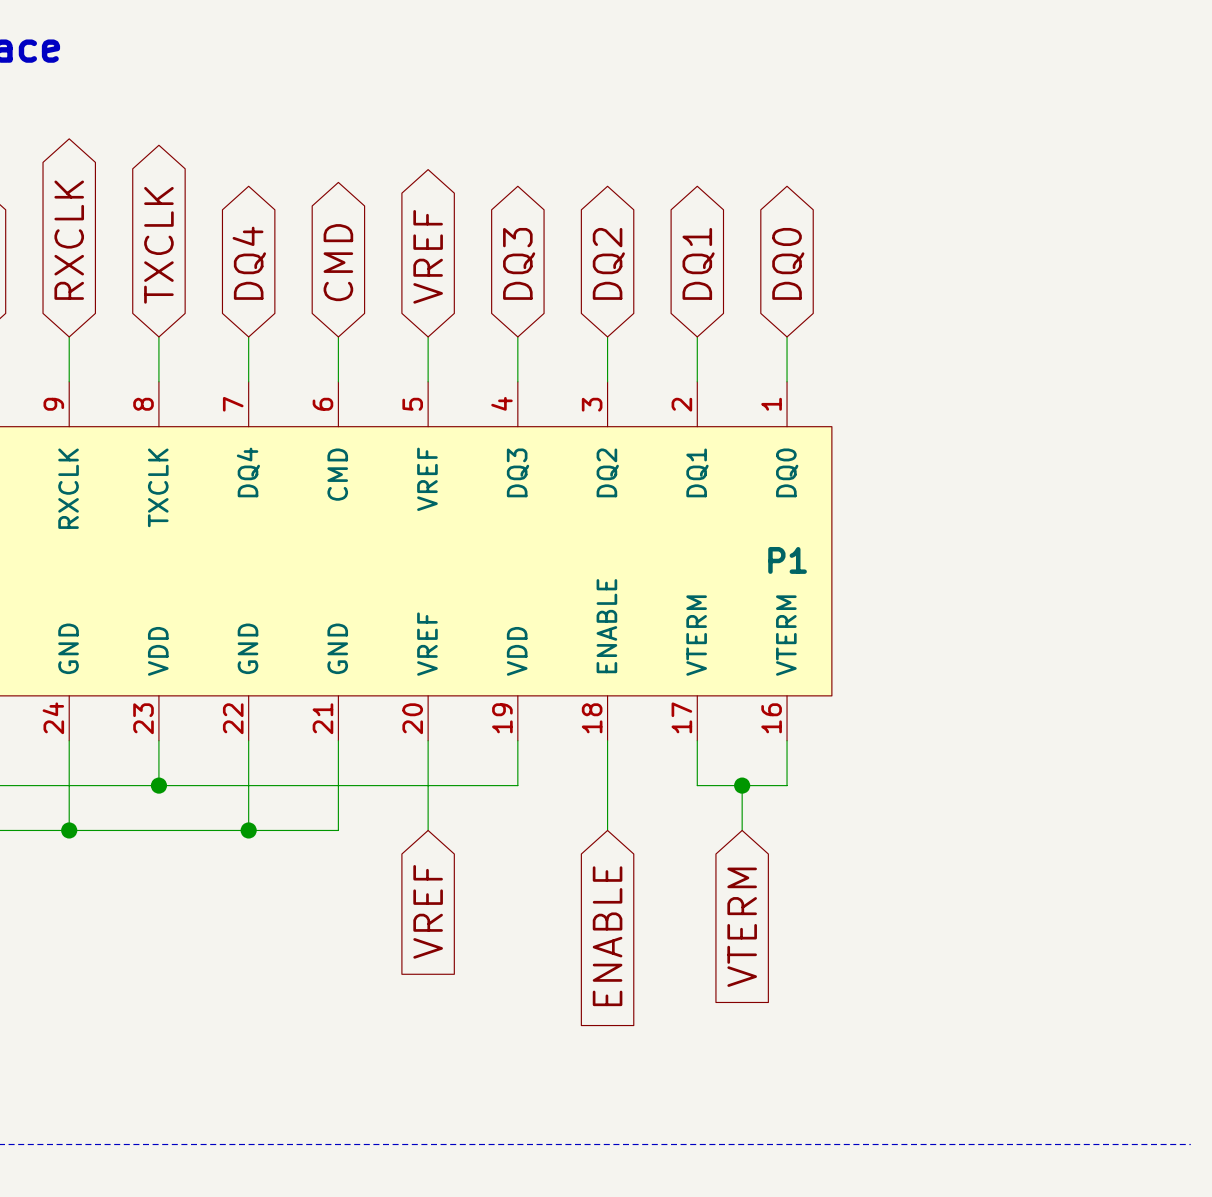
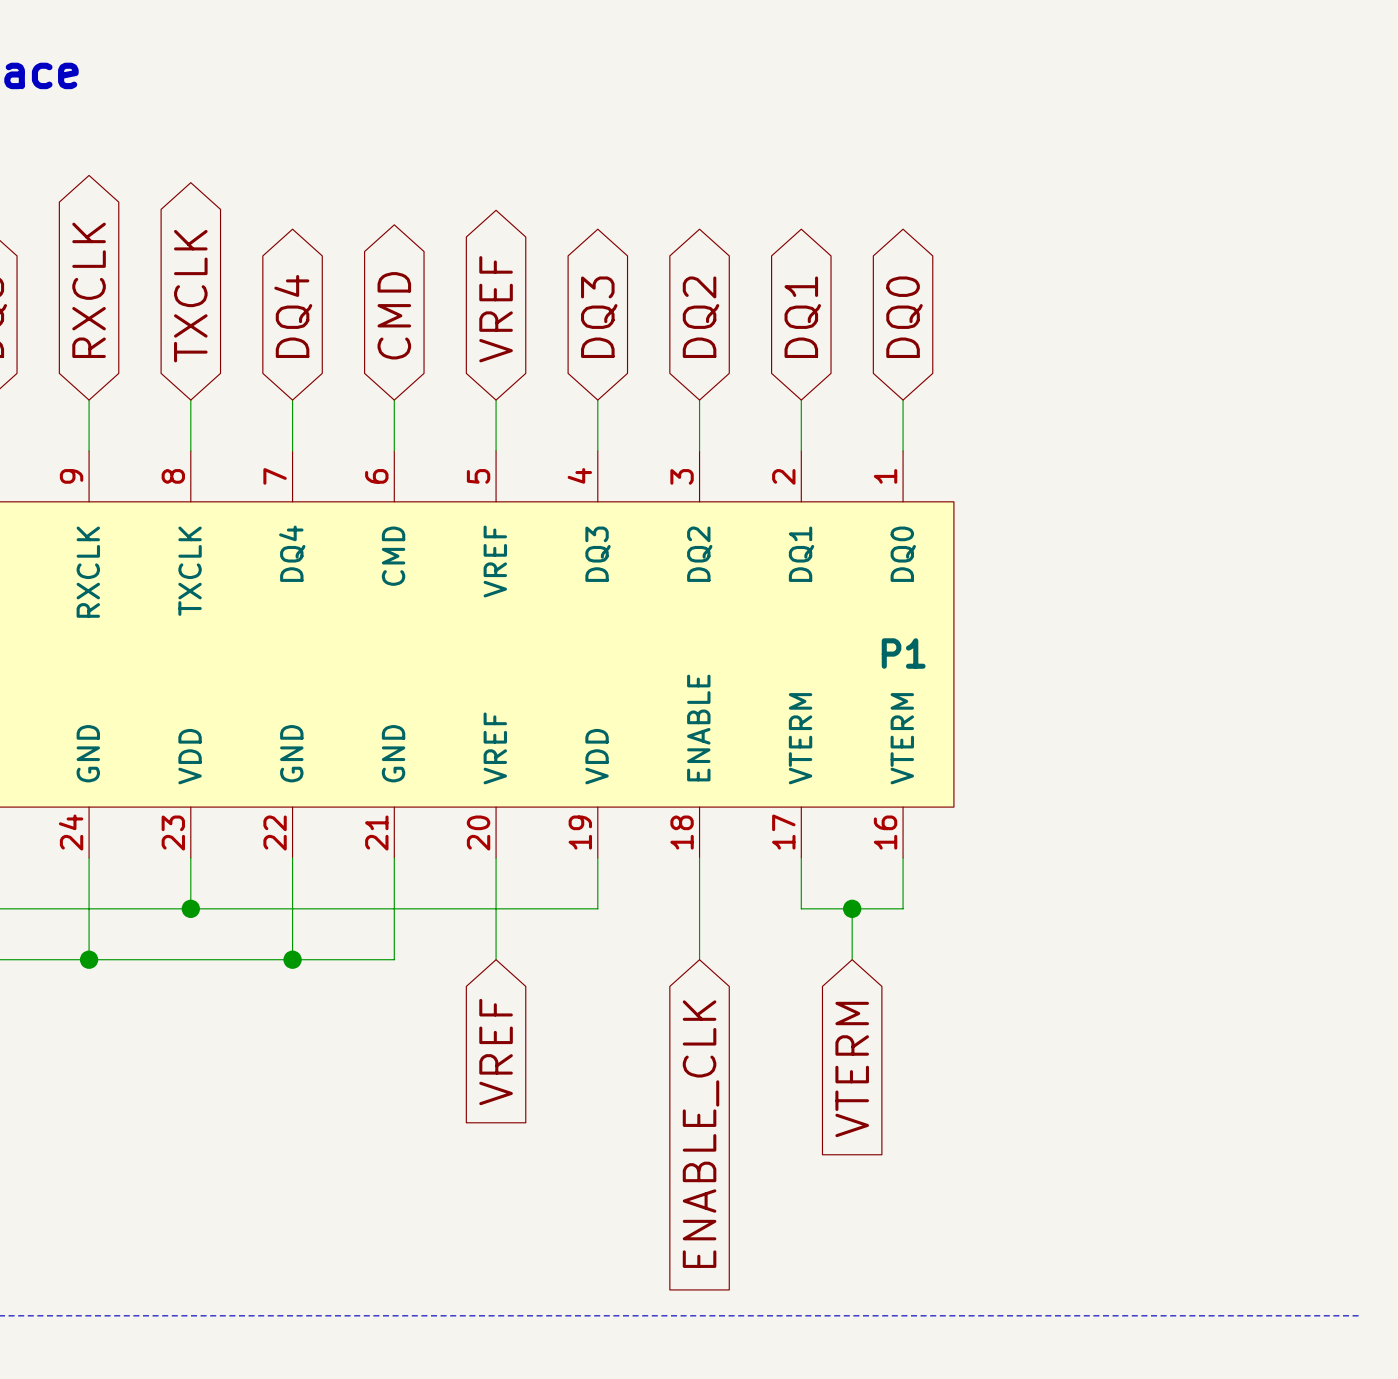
global label: ENABLE (607, 936) -> ENABLE_CLK (701, 1134)

